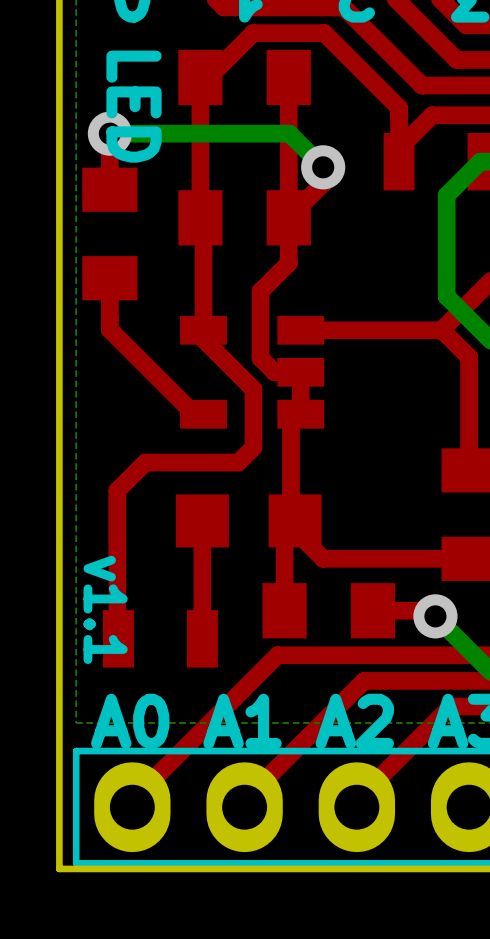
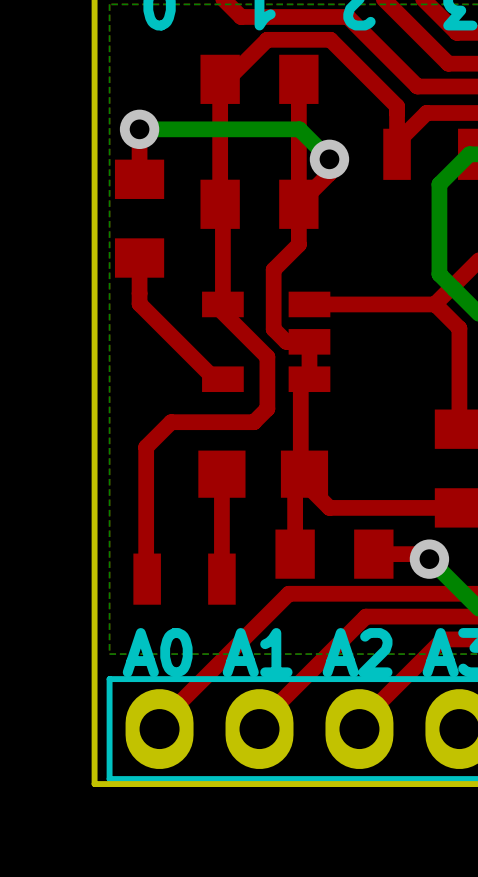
text: LED (134, 106) -> none
text: v1.1 (105, 609) -> none

